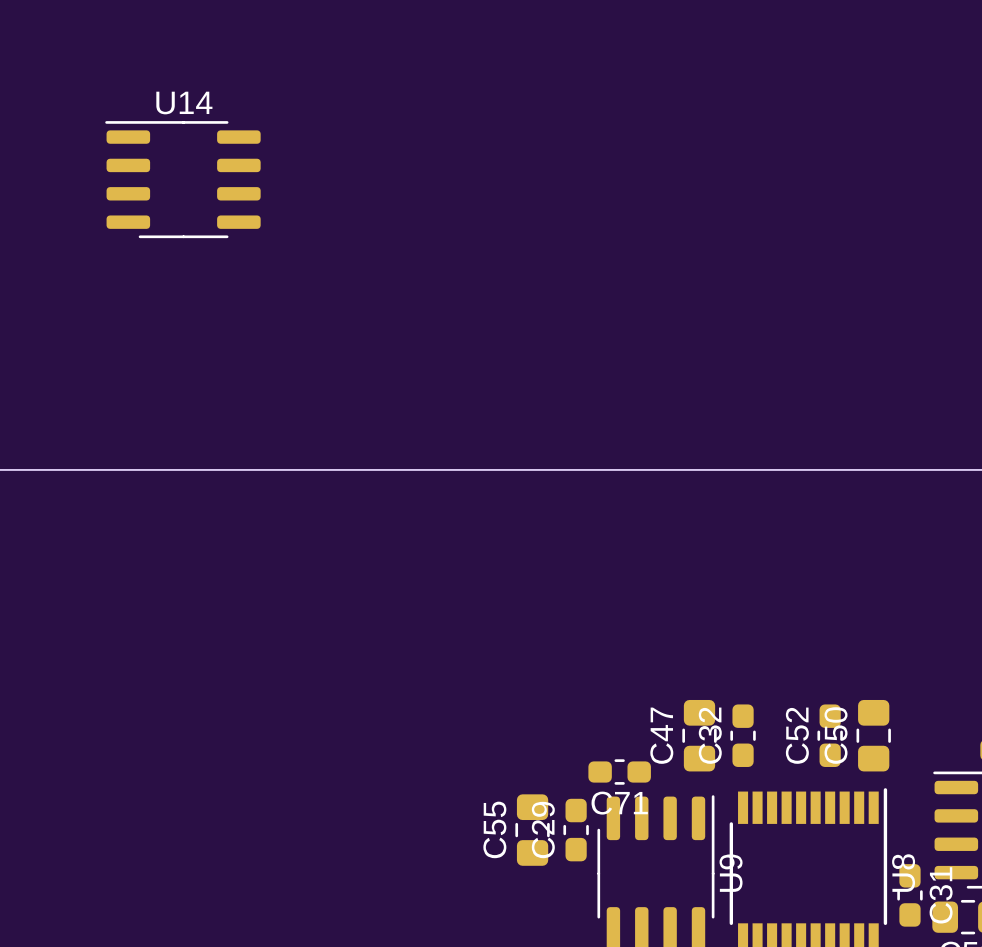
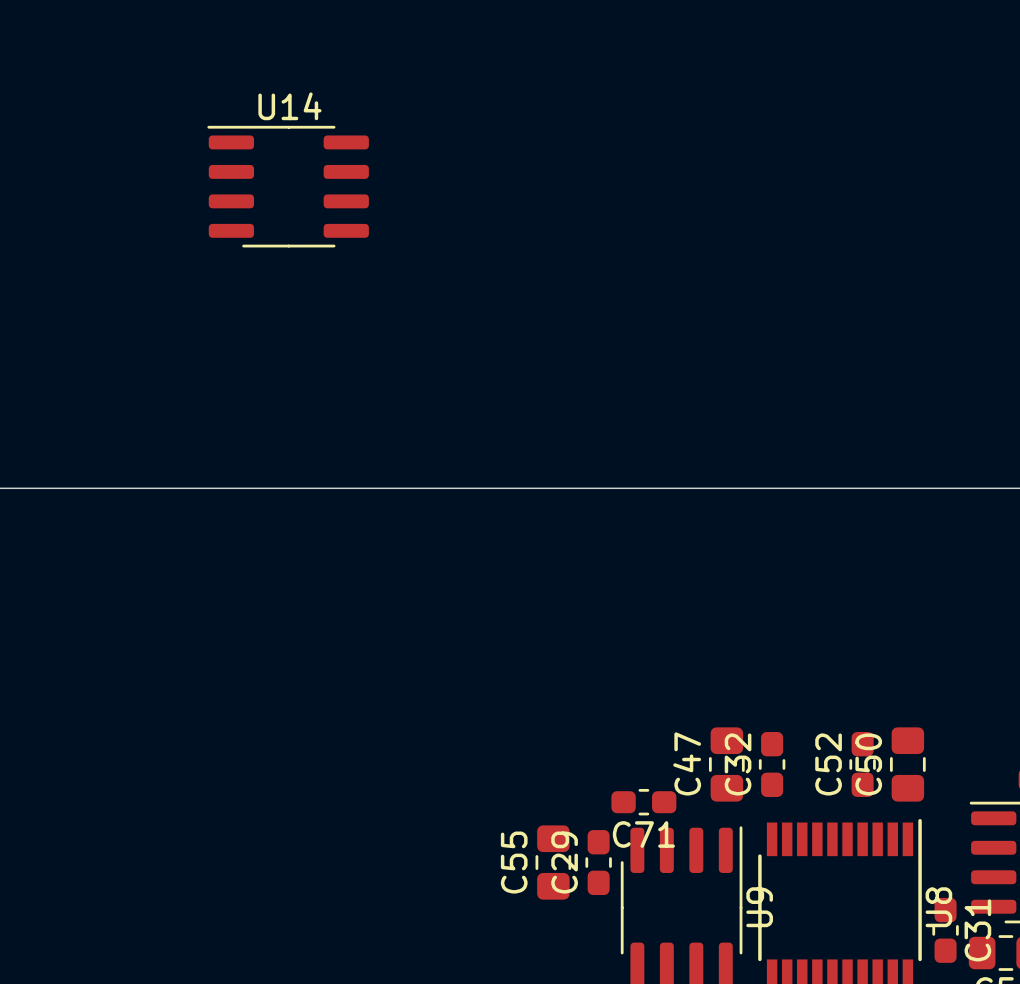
U14 position: (182, 179) -> (288, 186)

